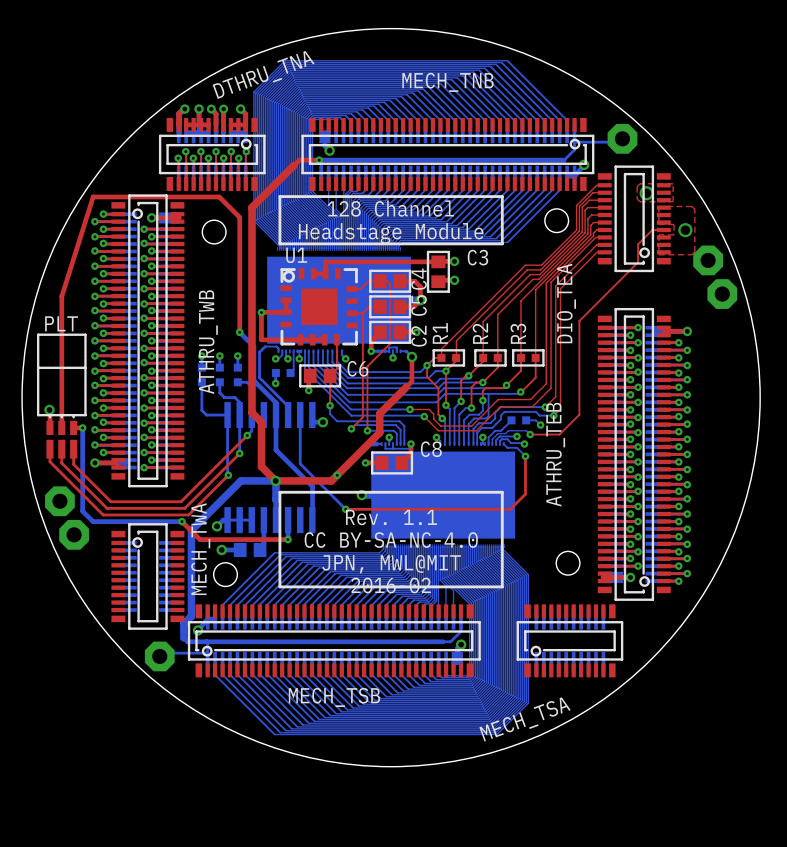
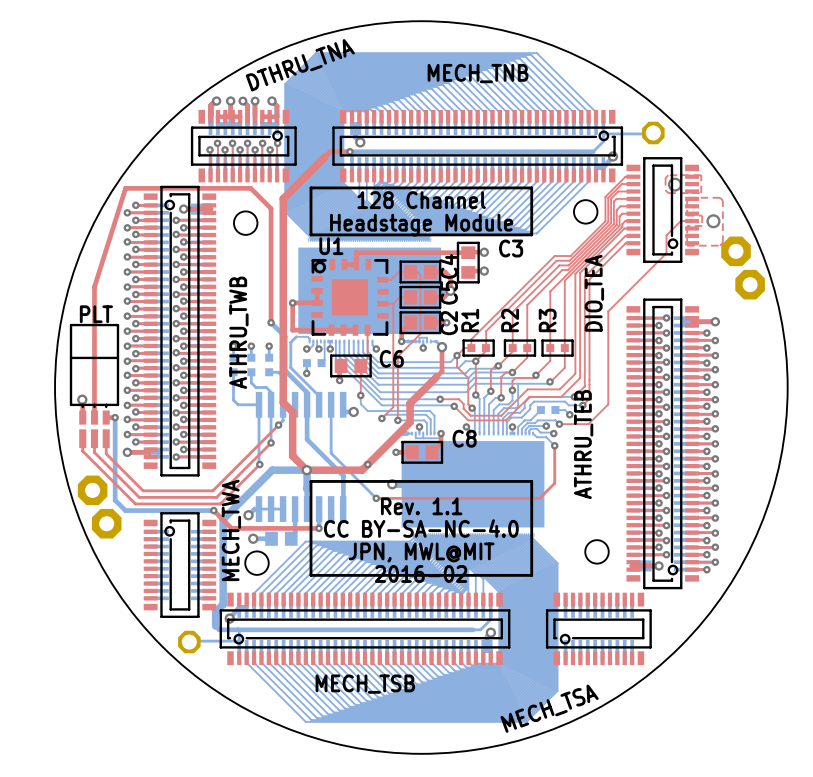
part footprint: [607, 123, 638, 154] -> [642, 121, 665, 145]
part footprint: [144, 641, 175, 672] -> [178, 630, 201, 654]

